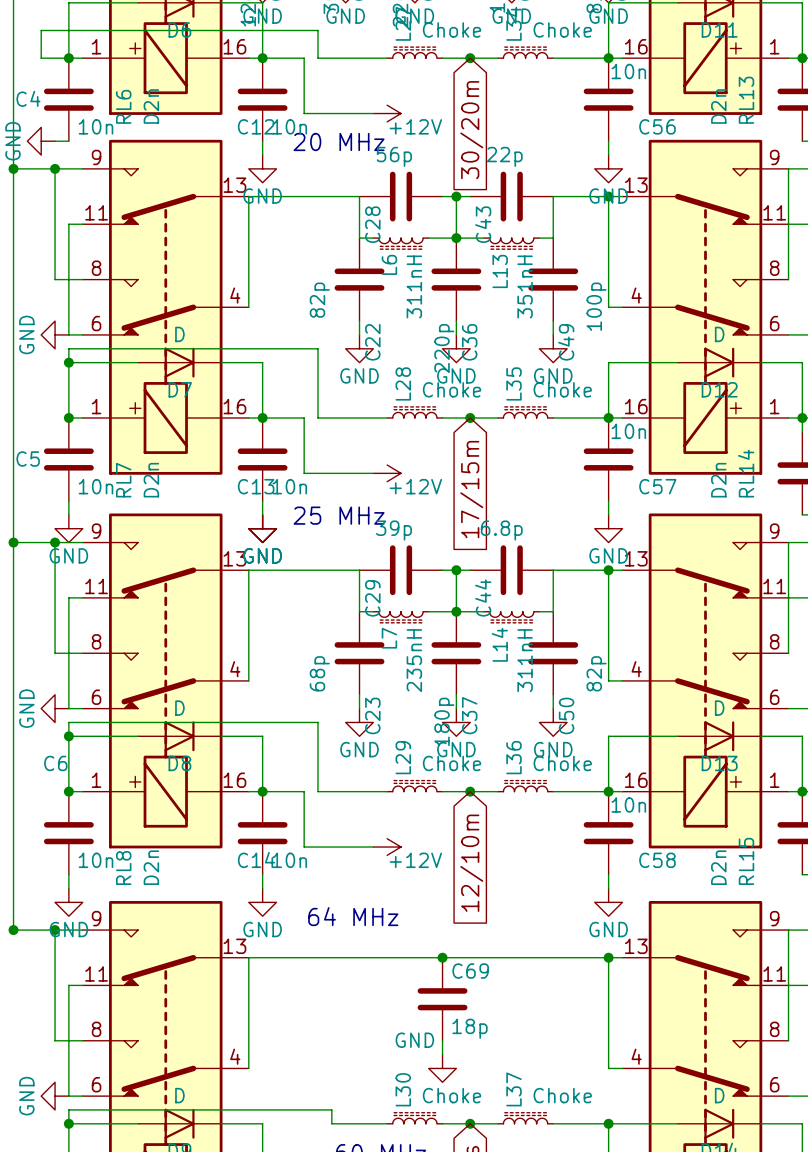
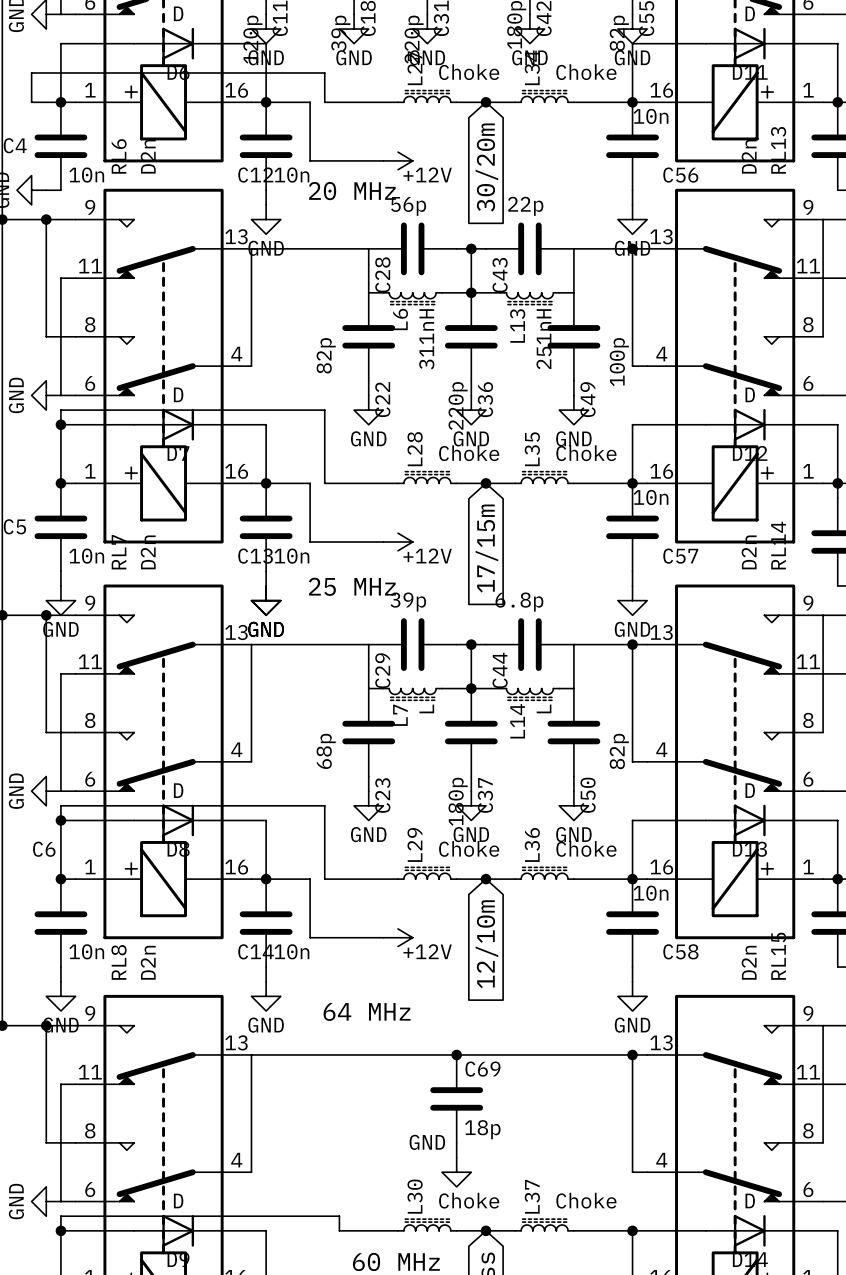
L13 value: 351nH (525, 286) -> 251nH (544, 339)
L7 value: 235nH (414, 660) -> L (426, 708)
L14 value: 311nH (525, 660) -> L (544, 708)

